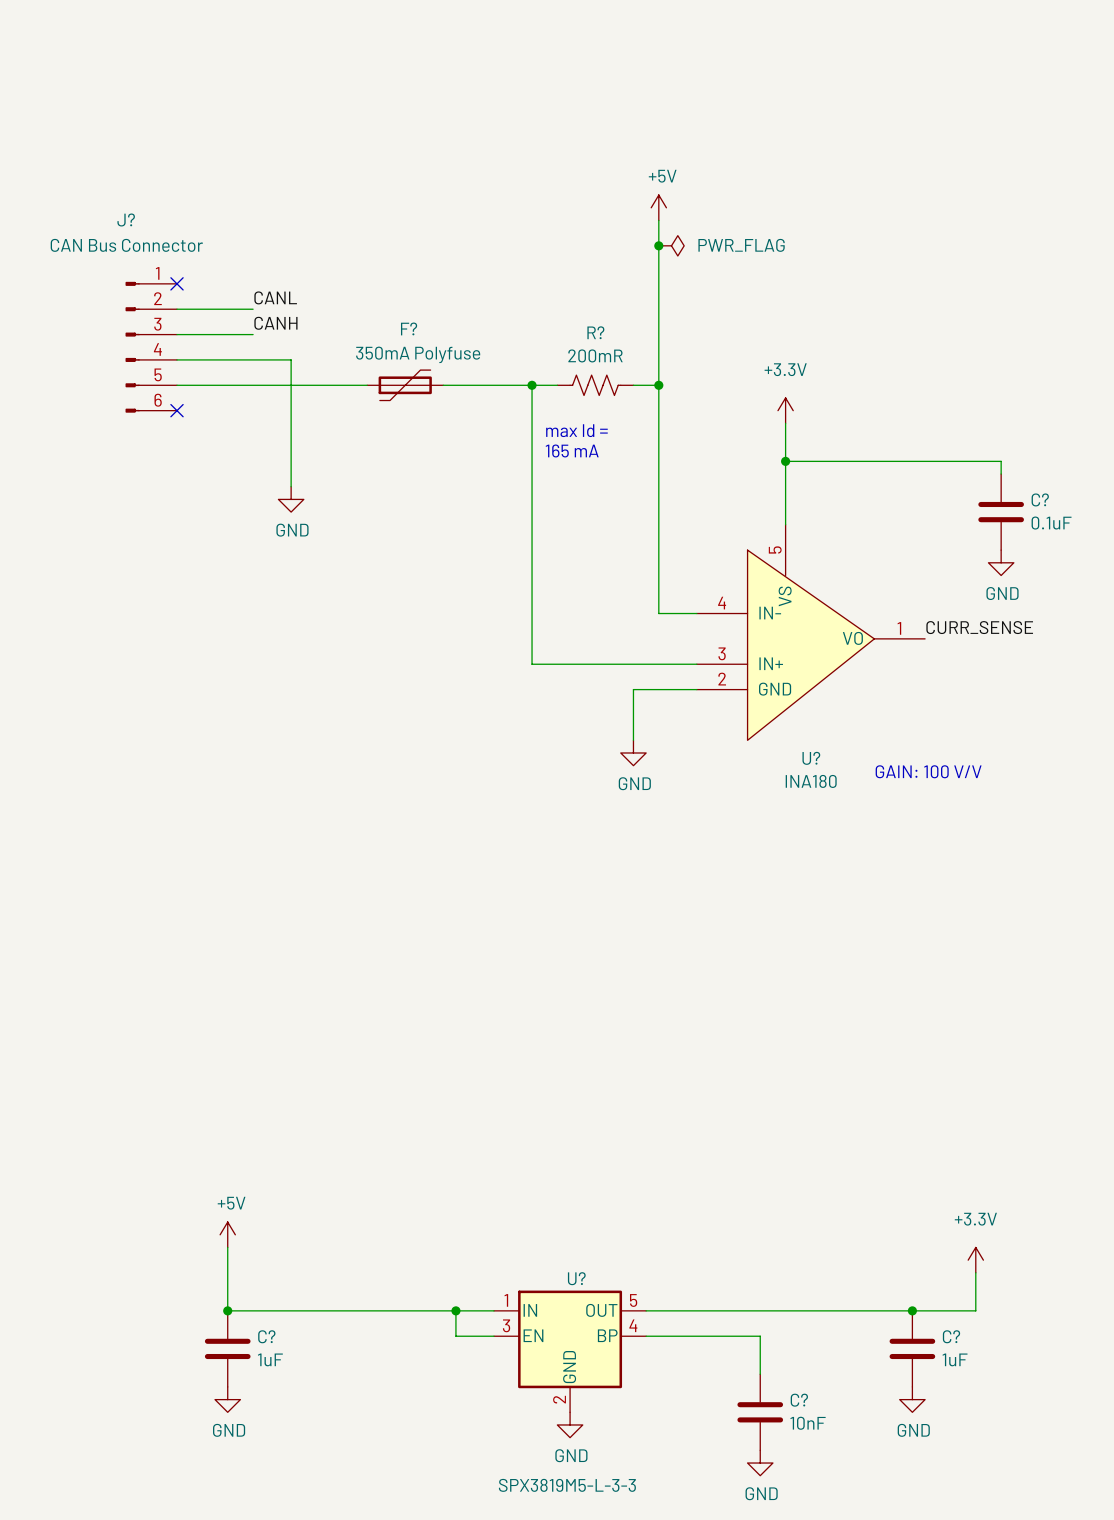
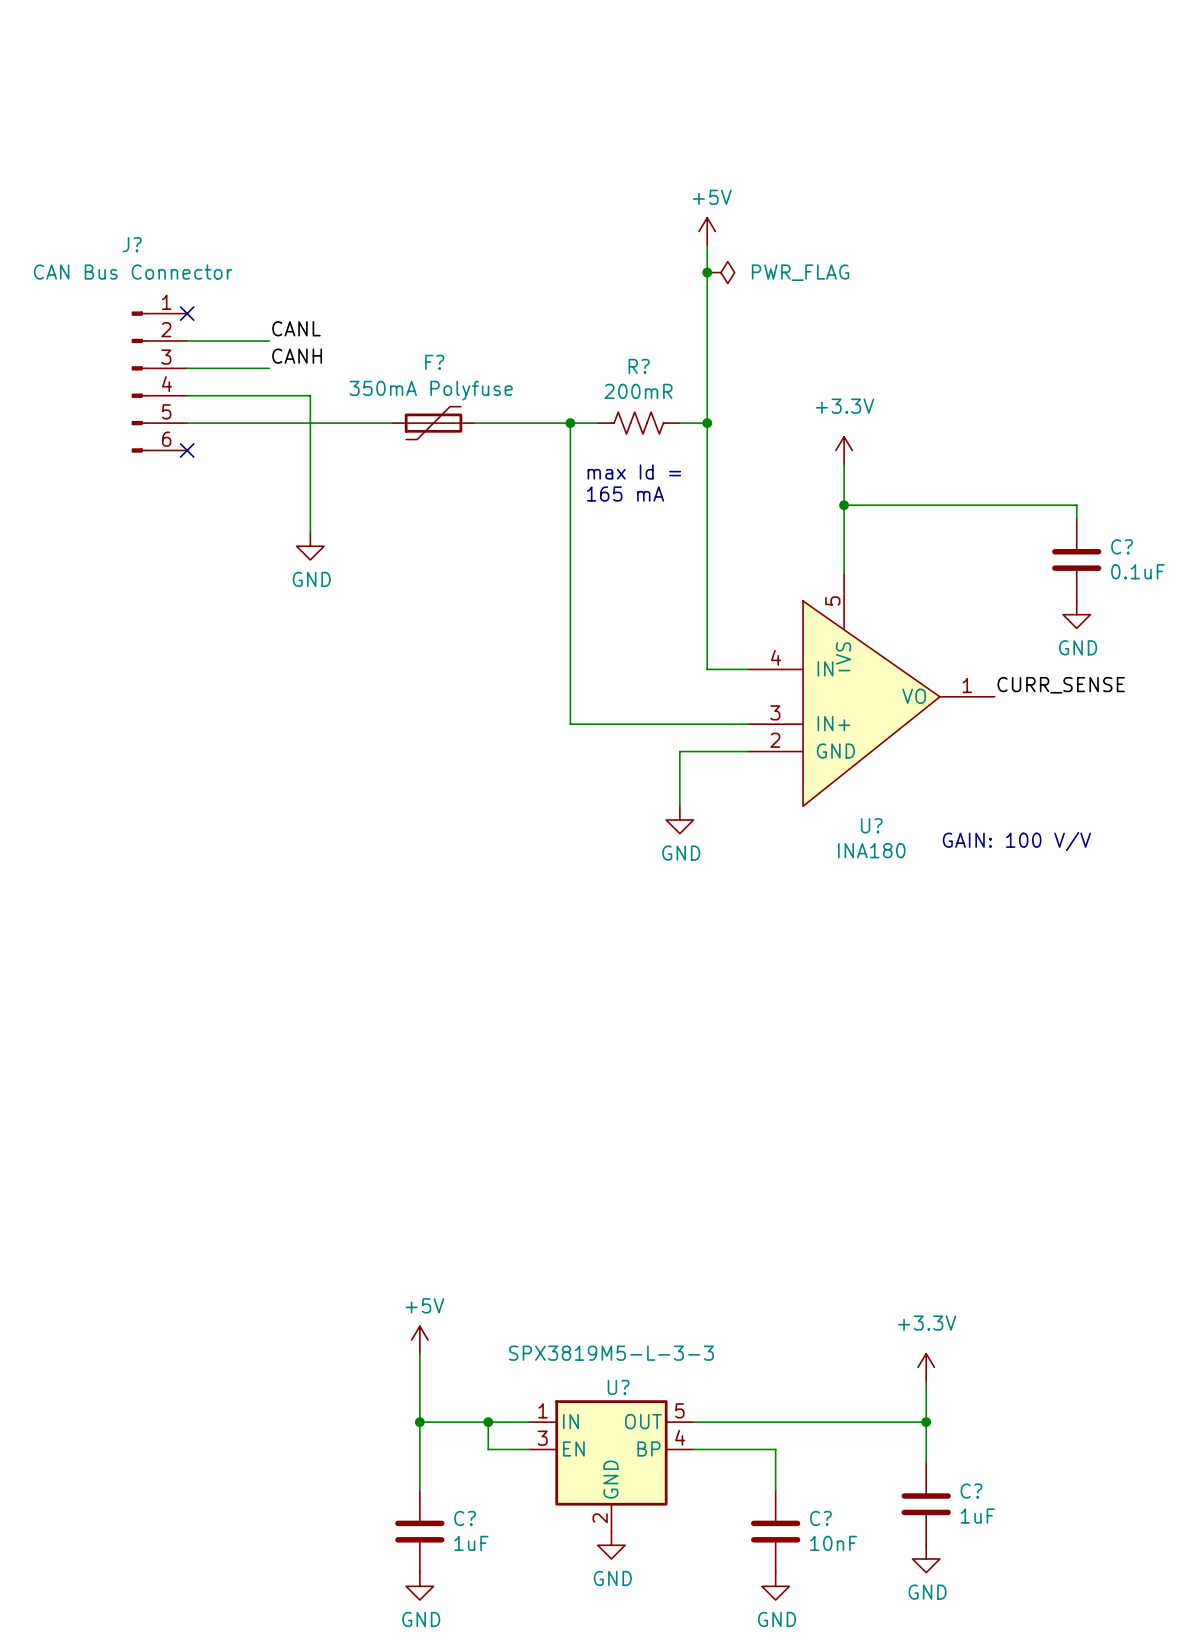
power symbol position: +5V (227, 1234) -> +5V (419, 1340)
wire: (227, 1247) (227, 1310) (392, 1310) -> none
wire: none -> (419, 1353) (419, 1490)
power symbol position: +3.3V (975, 1260) -> +3.3V (926, 1367)
wire: none -> (926, 1381) (926, 1463)
wire: (975, 1272) (975, 1310) (861, 1310) -> none
junction: (227, 1310) -> none
junction: none -> (419, 1422)
junction position: (912, 1310) -> (926, 1422)
wire: (722, 1336) (760, 1336) (760, 1374) -> (775, 1449) (775, 1490)
C? position: (227, 1348) -> (419, 1531)
C? position: (912, 1348) -> (926, 1504)
power symbol position: GND (227, 1399) -> GND (419, 1586)
power symbol: GND (912, 1399) -> none
C? position: (760, 1412) -> (775, 1531)
power symbol: none -> GND (926, 1558)
power symbol position: GND (760, 1463) -> GND (775, 1586)
U? value position: SPX3819M5-L-3-3 (567, 1485) -> SPX3819M5-L-3-3 (611, 1353)

